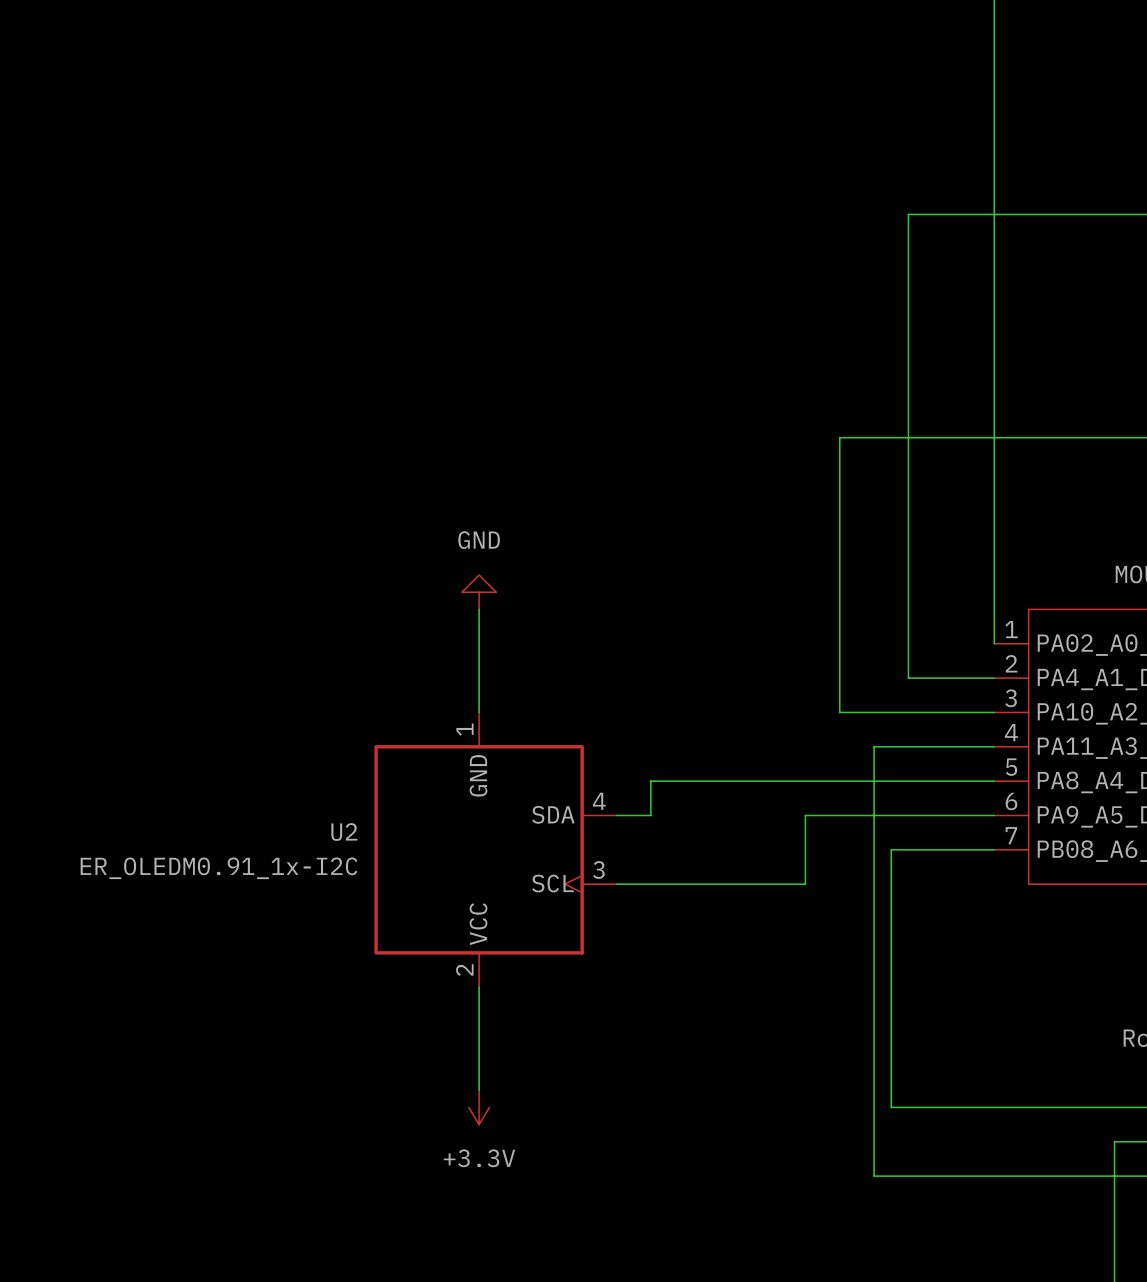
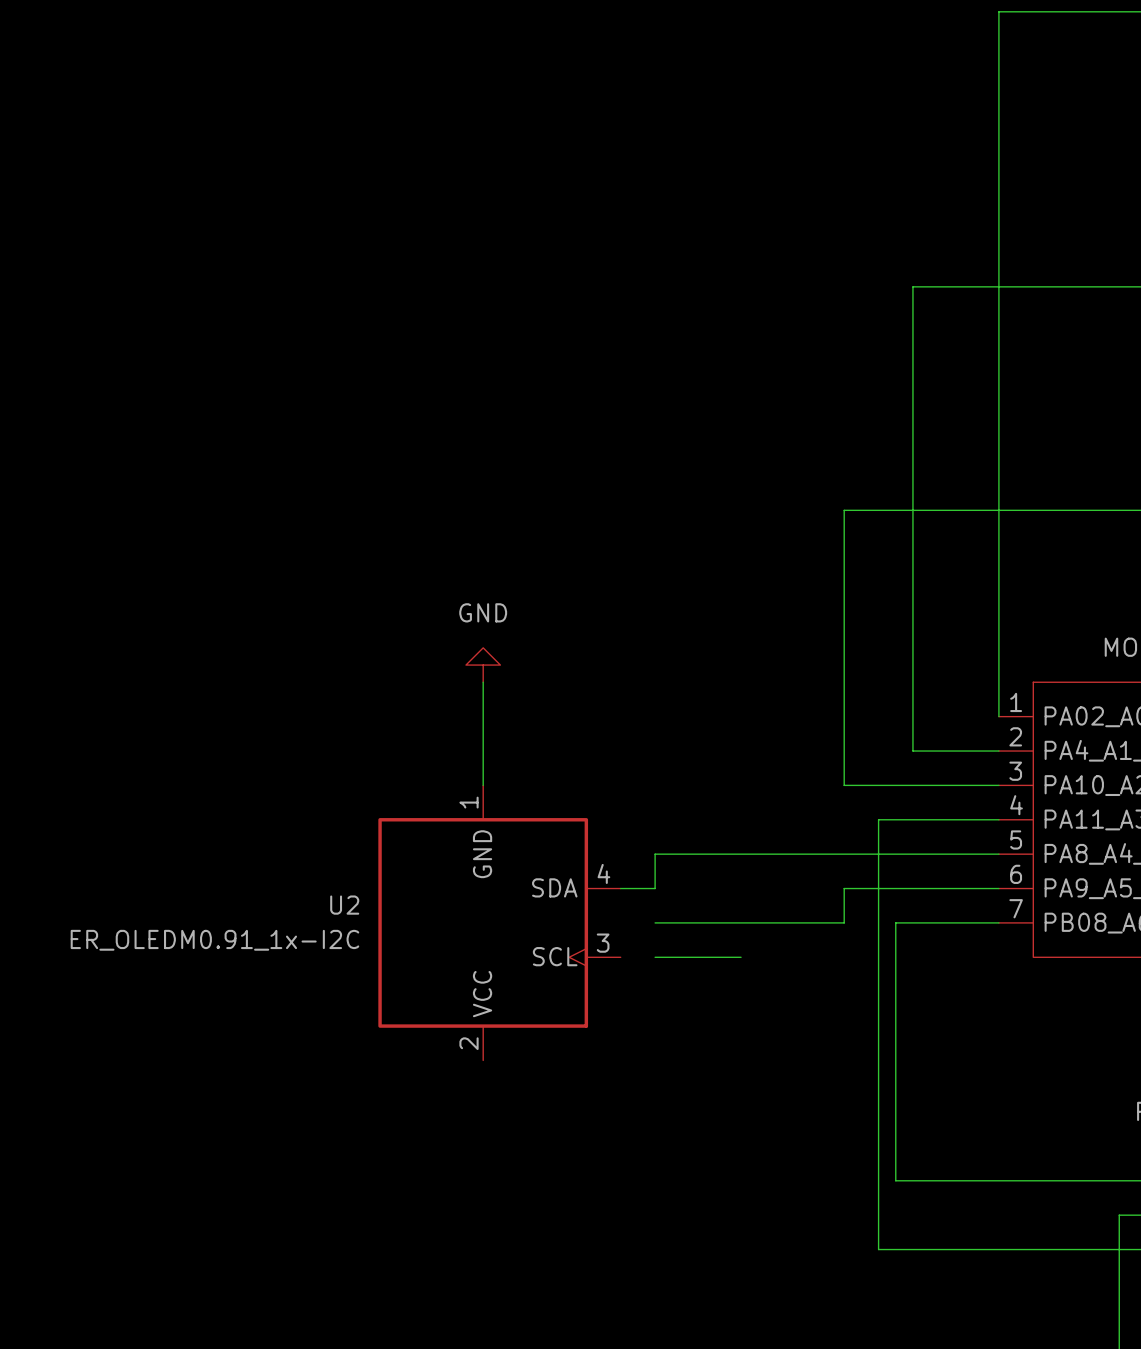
wire: (839, 815) (805, 815) (805, 884) (736, 884) -> (844, 888) (844, 922) (655, 922)
wire: (616, 884) (650, 884) -> none
wire: (479, 987) (479, 1090) -> none
power symbol: +3.3V (479, 1107) -> none

